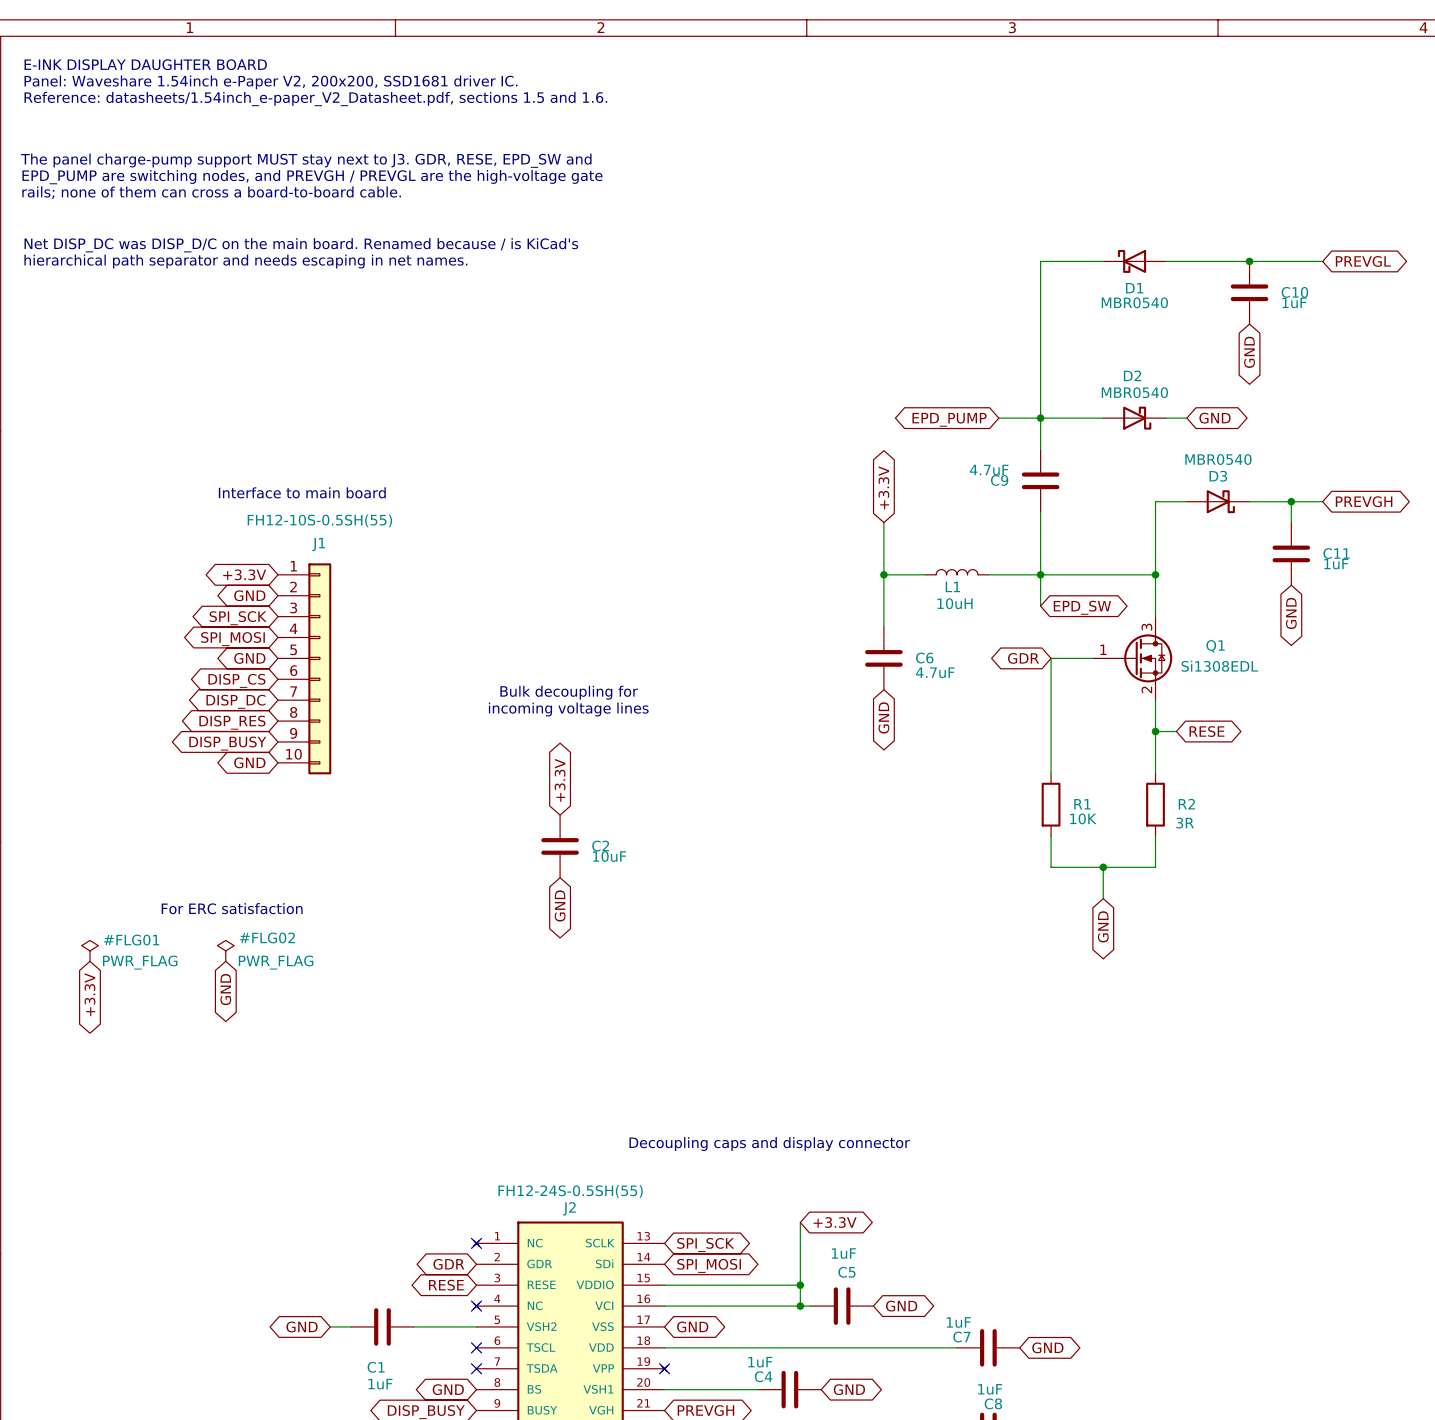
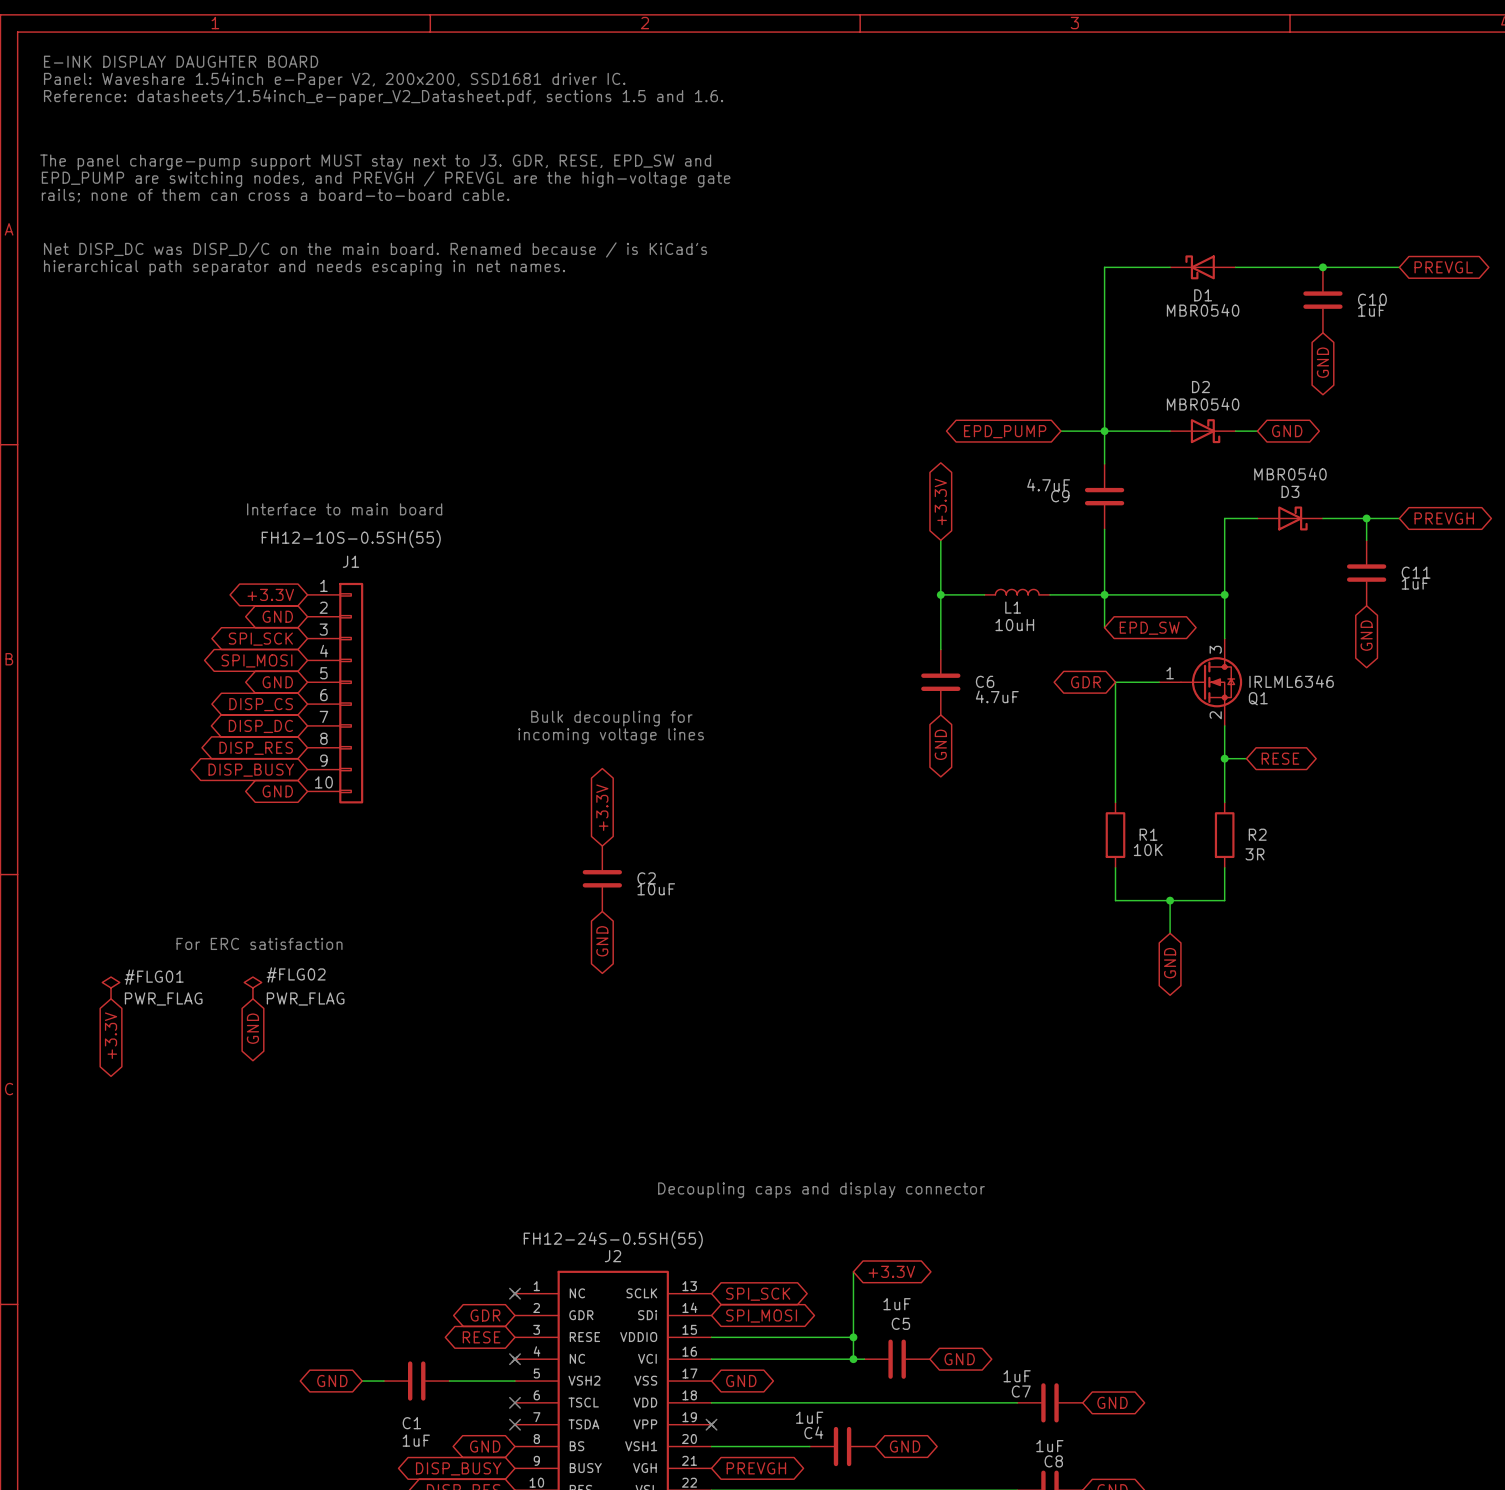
Q1 name position: Q1 (1215, 646) -> Q1 (1258, 698)
Q1 value: Si1308EDL (1219, 666) -> IRLML6346 (1291, 681)

